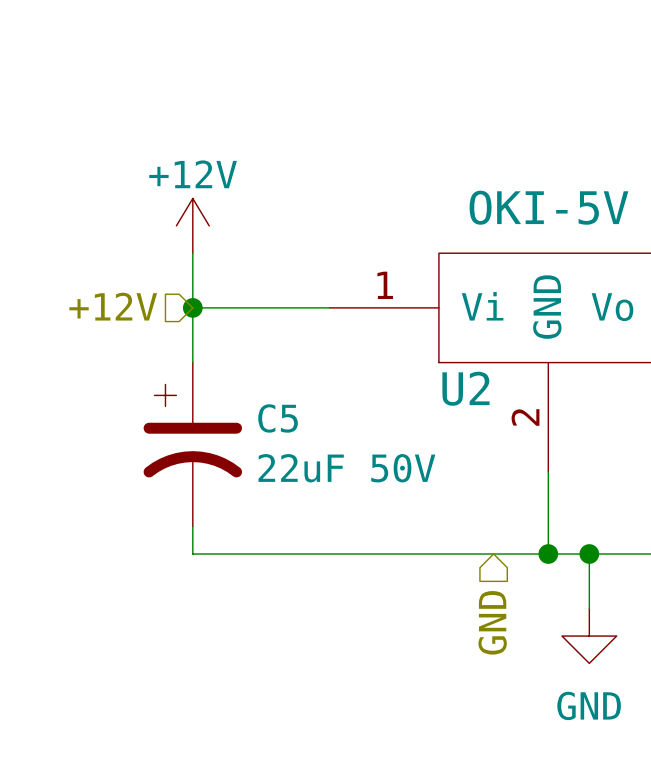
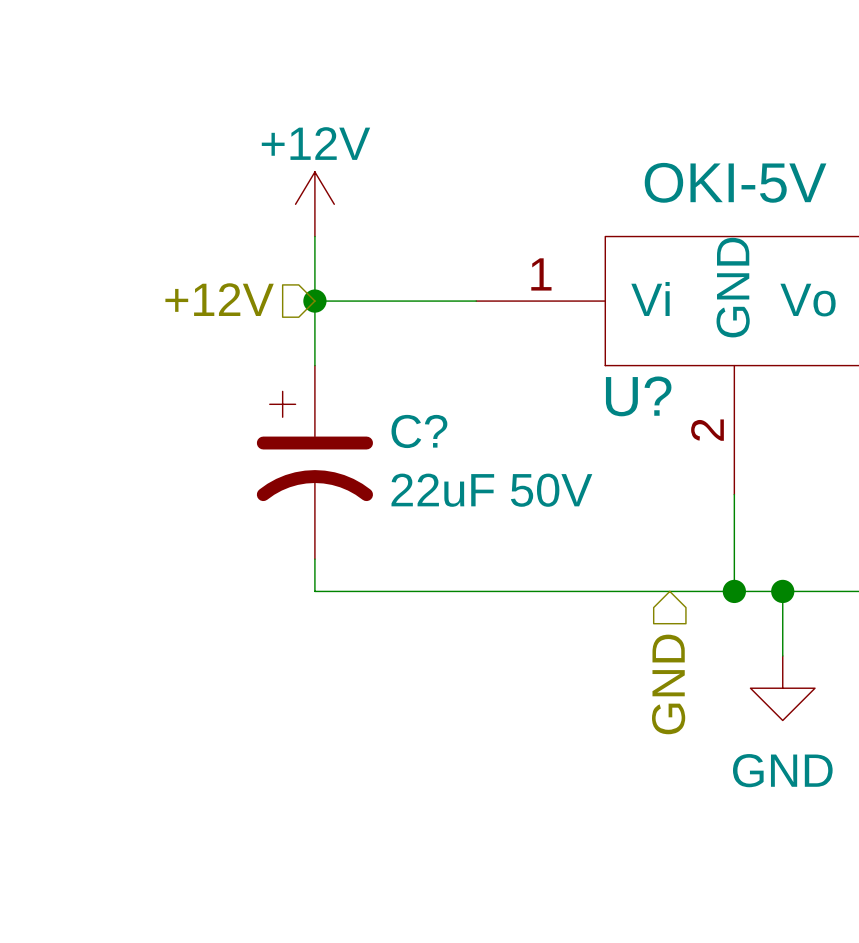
U2 name: U2 (465, 388) -> U? (638, 396)
C5 name: C5 (278, 418) -> C? (419, 431)

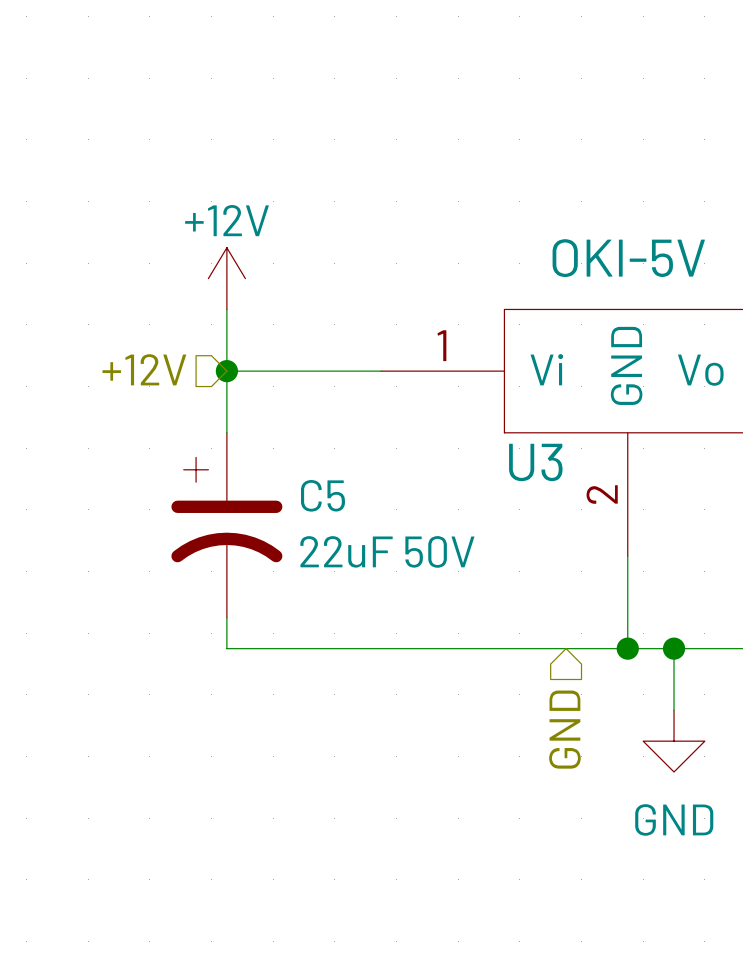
U? name: U? (638, 396) -> U3 (535, 462)
C? name: C? (419, 431) -> C5 (322, 495)

